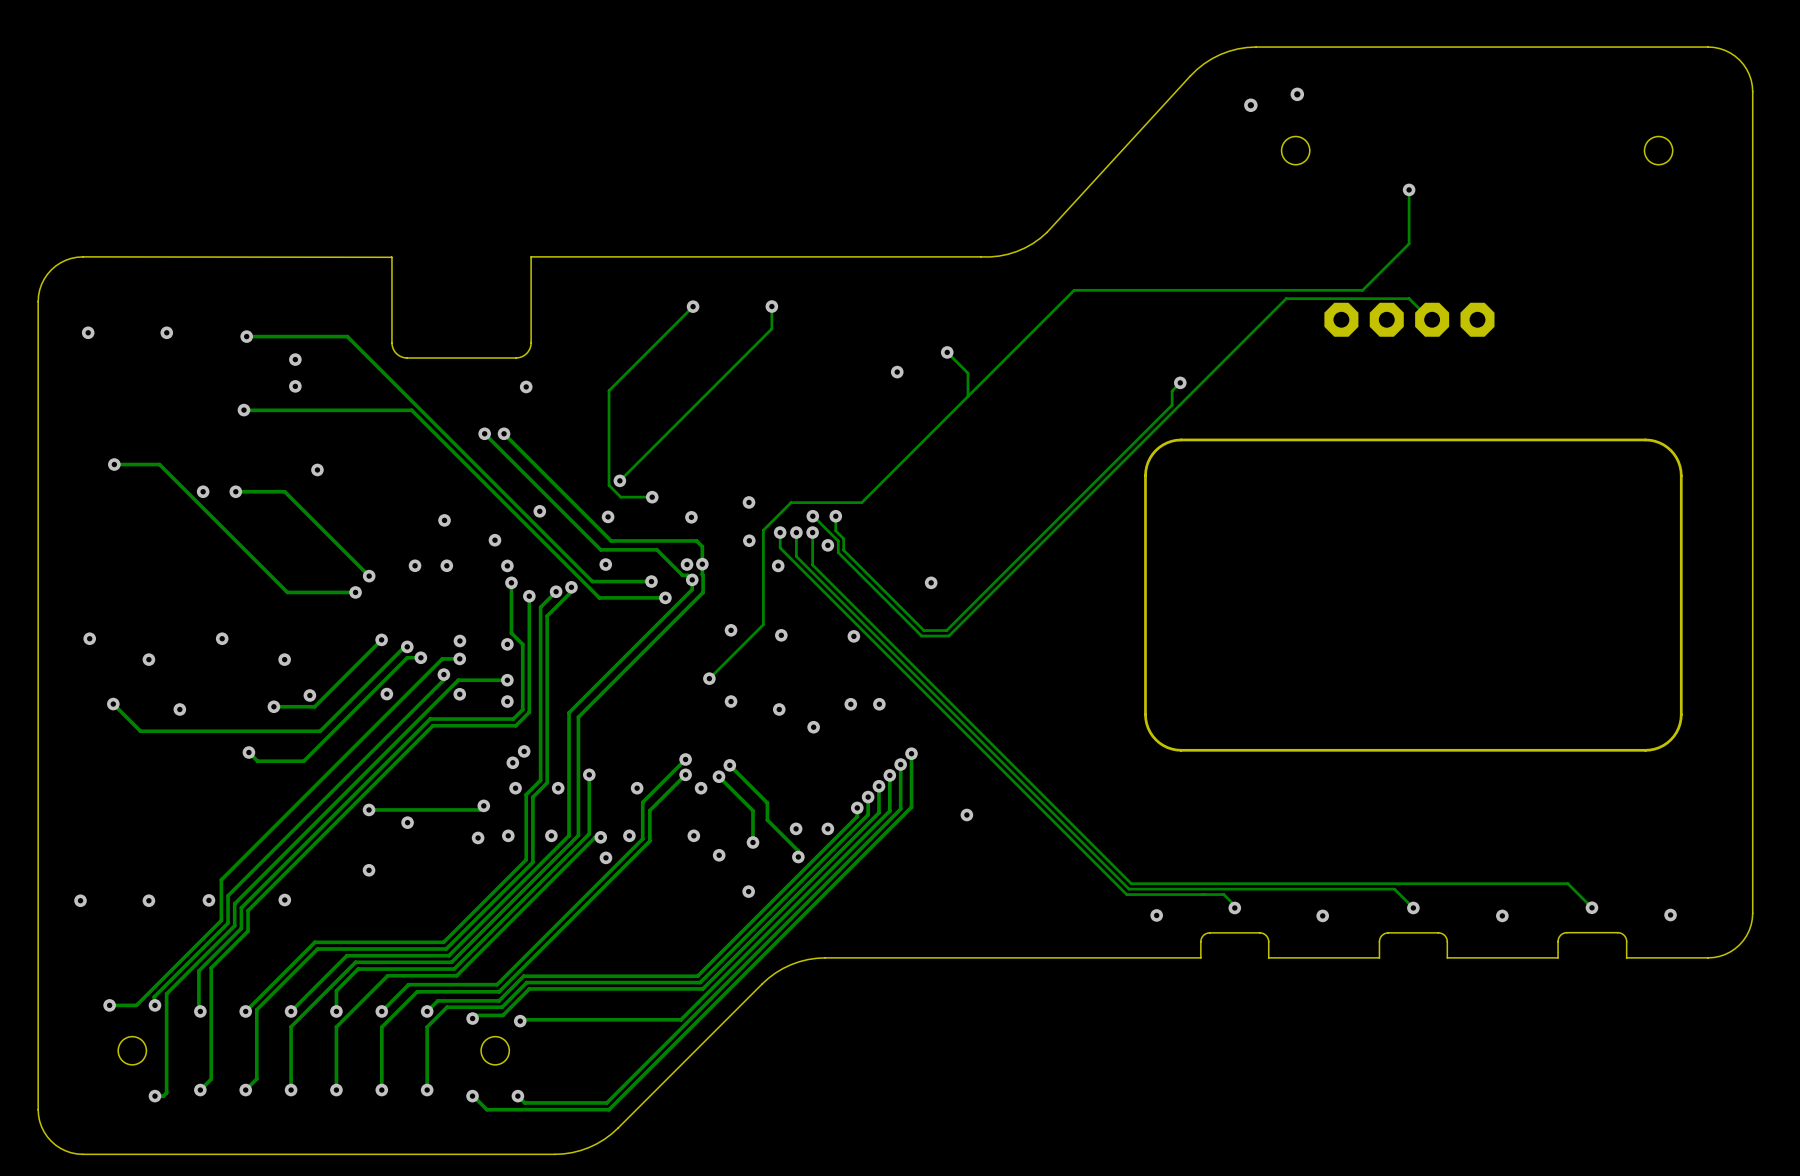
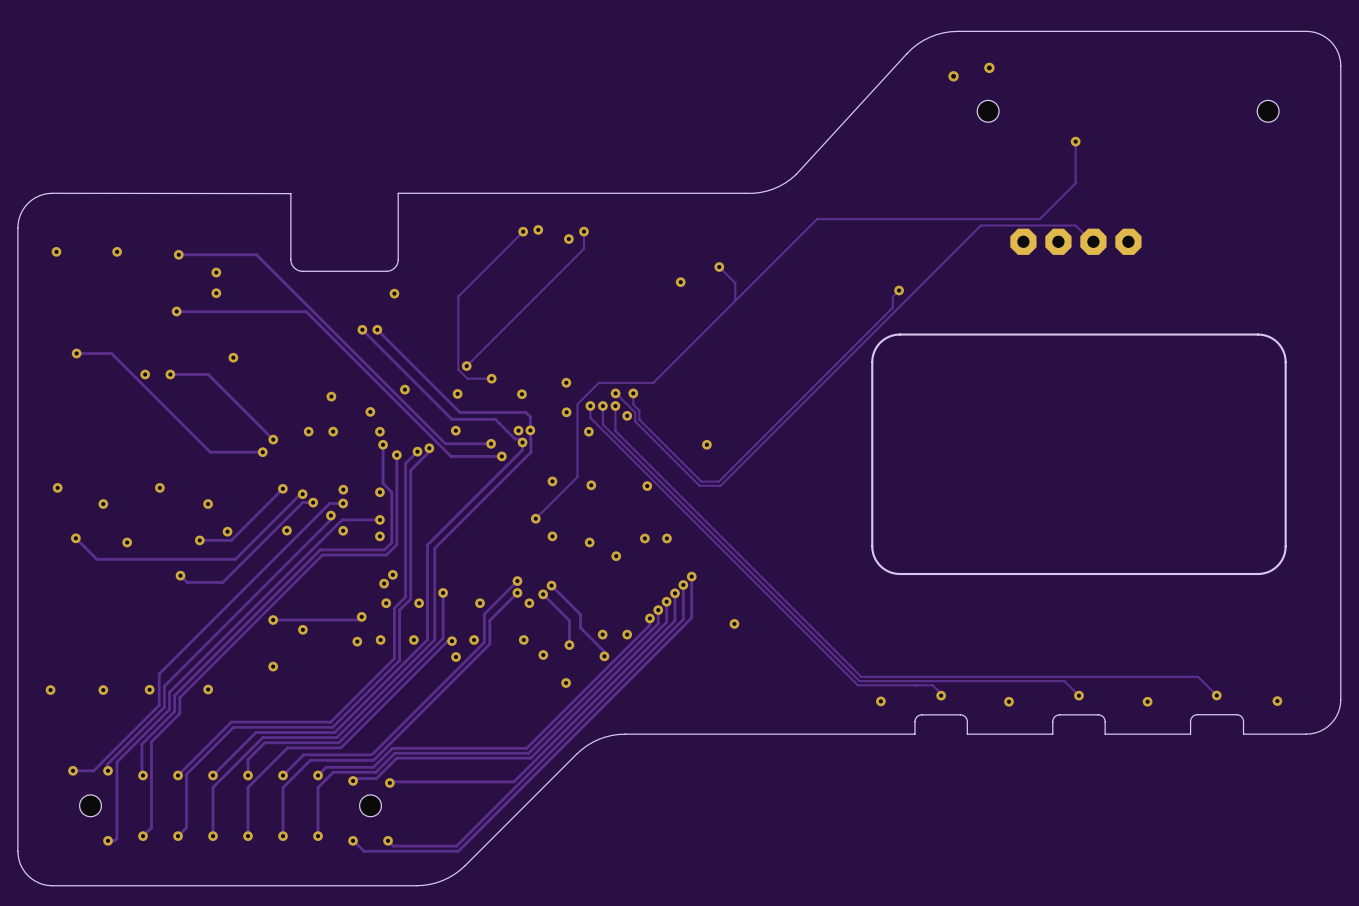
via: none -> (538, 229)
via: none -> (568, 239)

